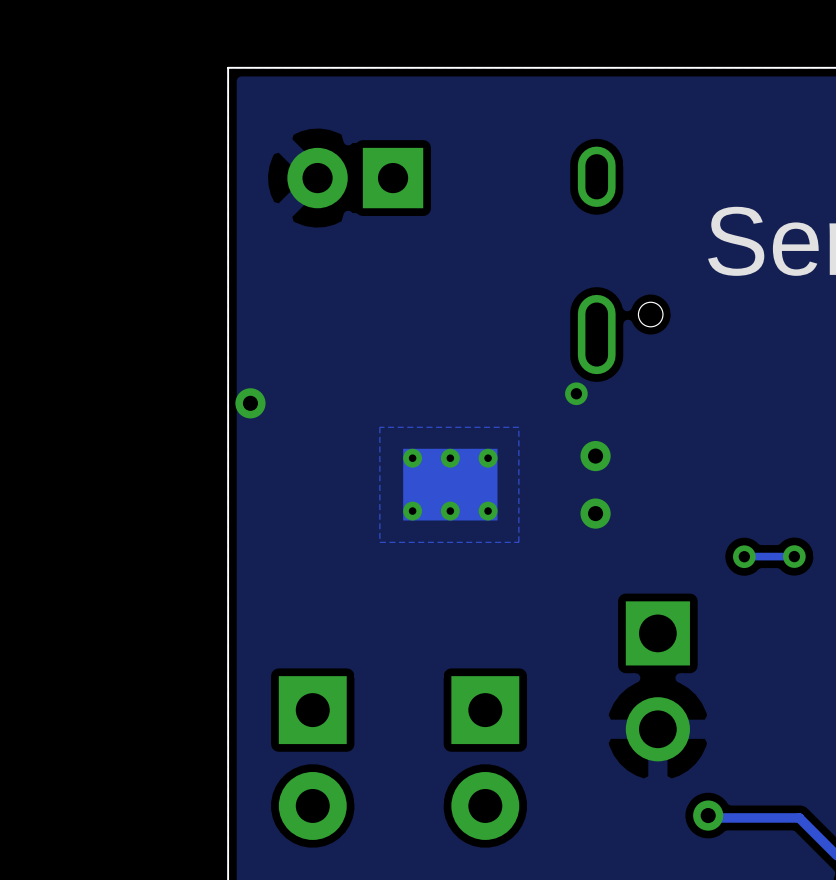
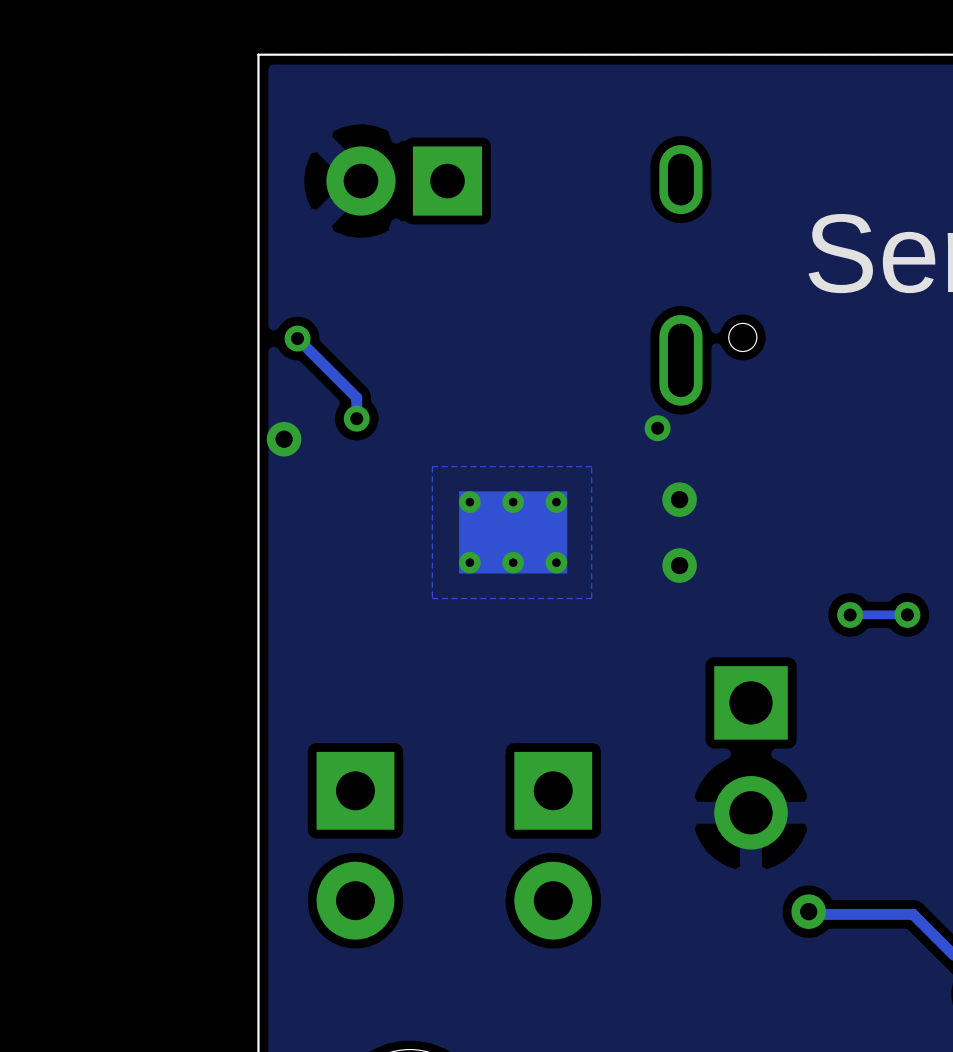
track: none -> (297, 338) (356, 397) (356, 418)
via: none -> (297, 338)
via: none -> (356, 418)

